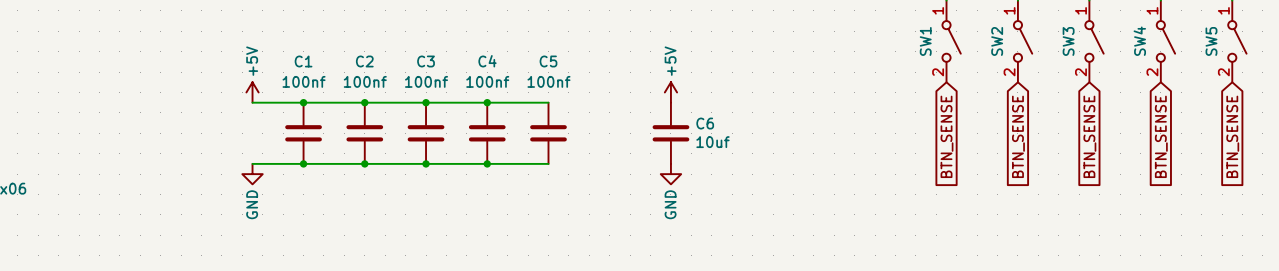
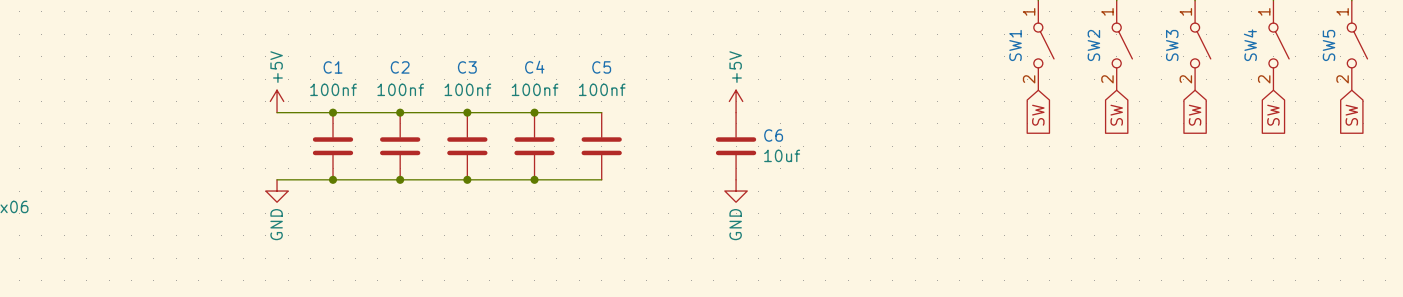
global label: BTN_SENSE (947, 136) -> SW (1038, 115)
global label: BTN_SENSE (1018, 136) -> SW (1116, 115)
global label: BTN_SENSE (1089, 136) -> SW (1195, 115)
global label: BTN_SENSE (1161, 136) -> SW (1273, 115)
global label: BTN_SENSE (1232, 136) -> SW (1351, 115)

